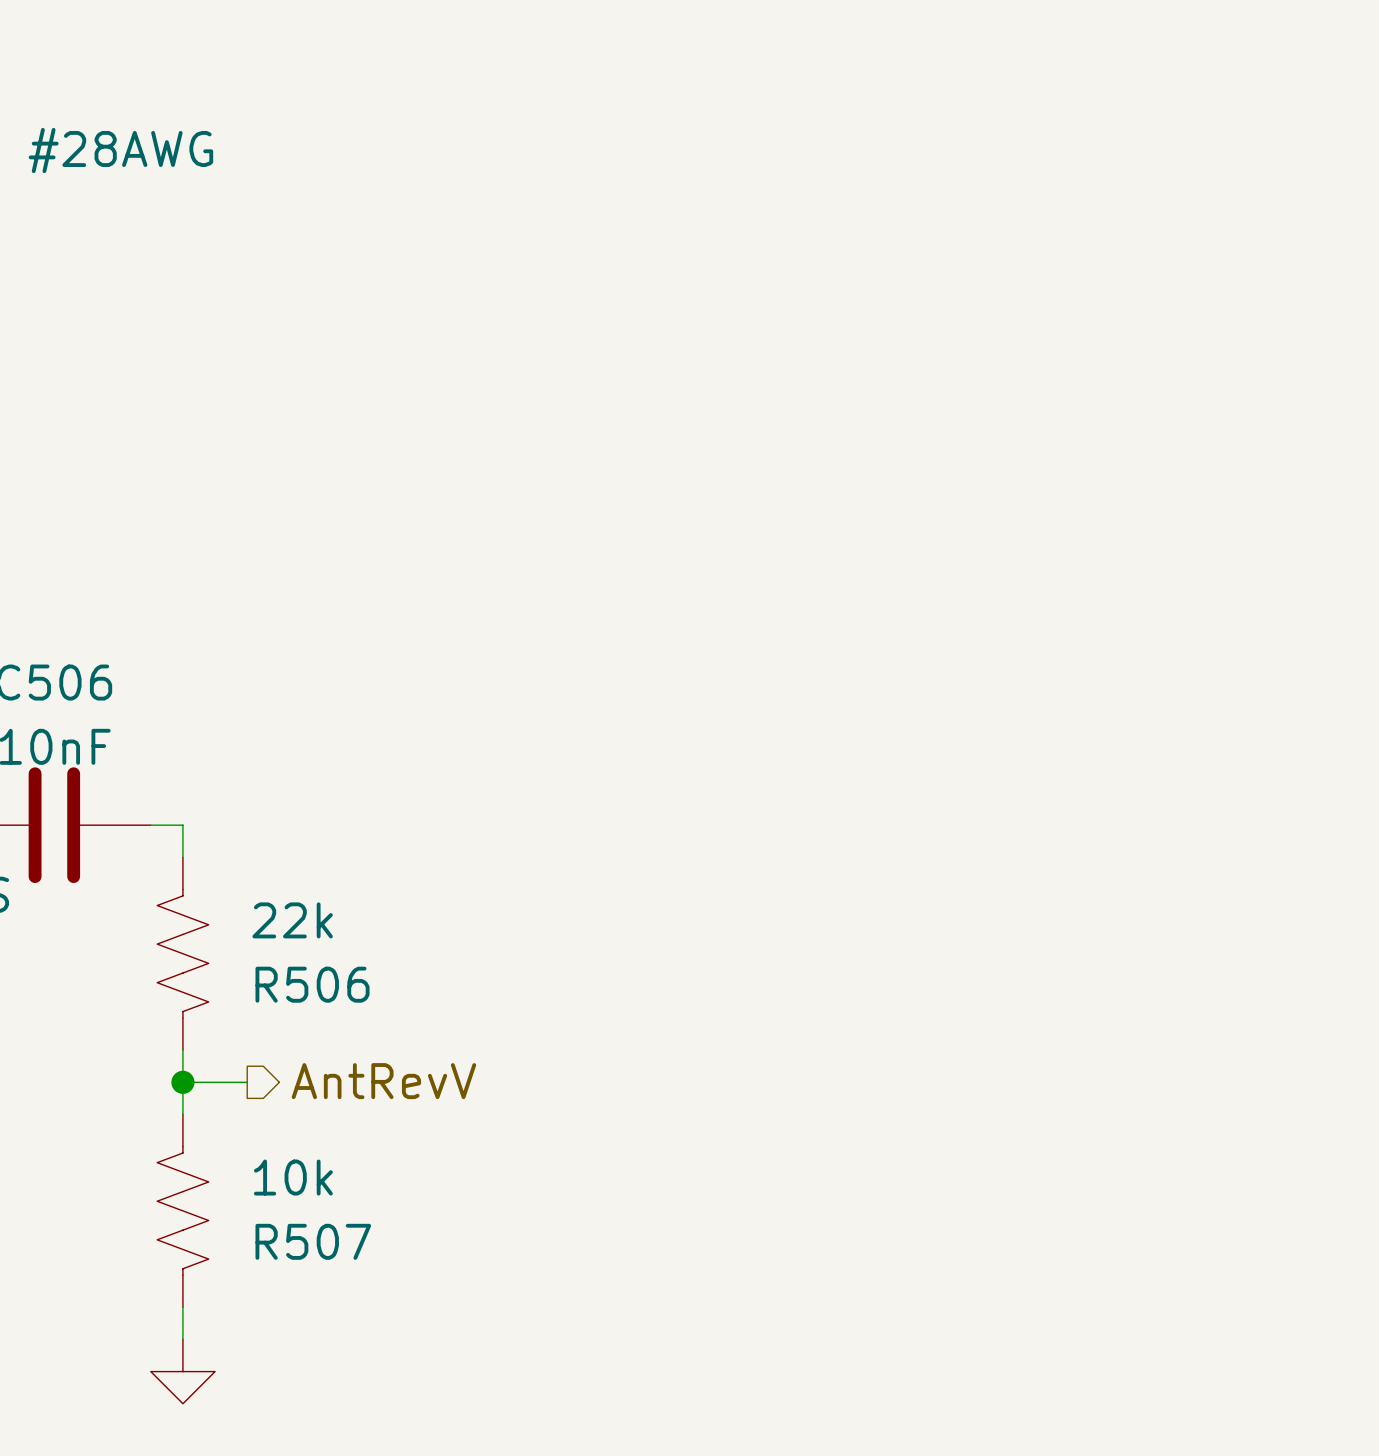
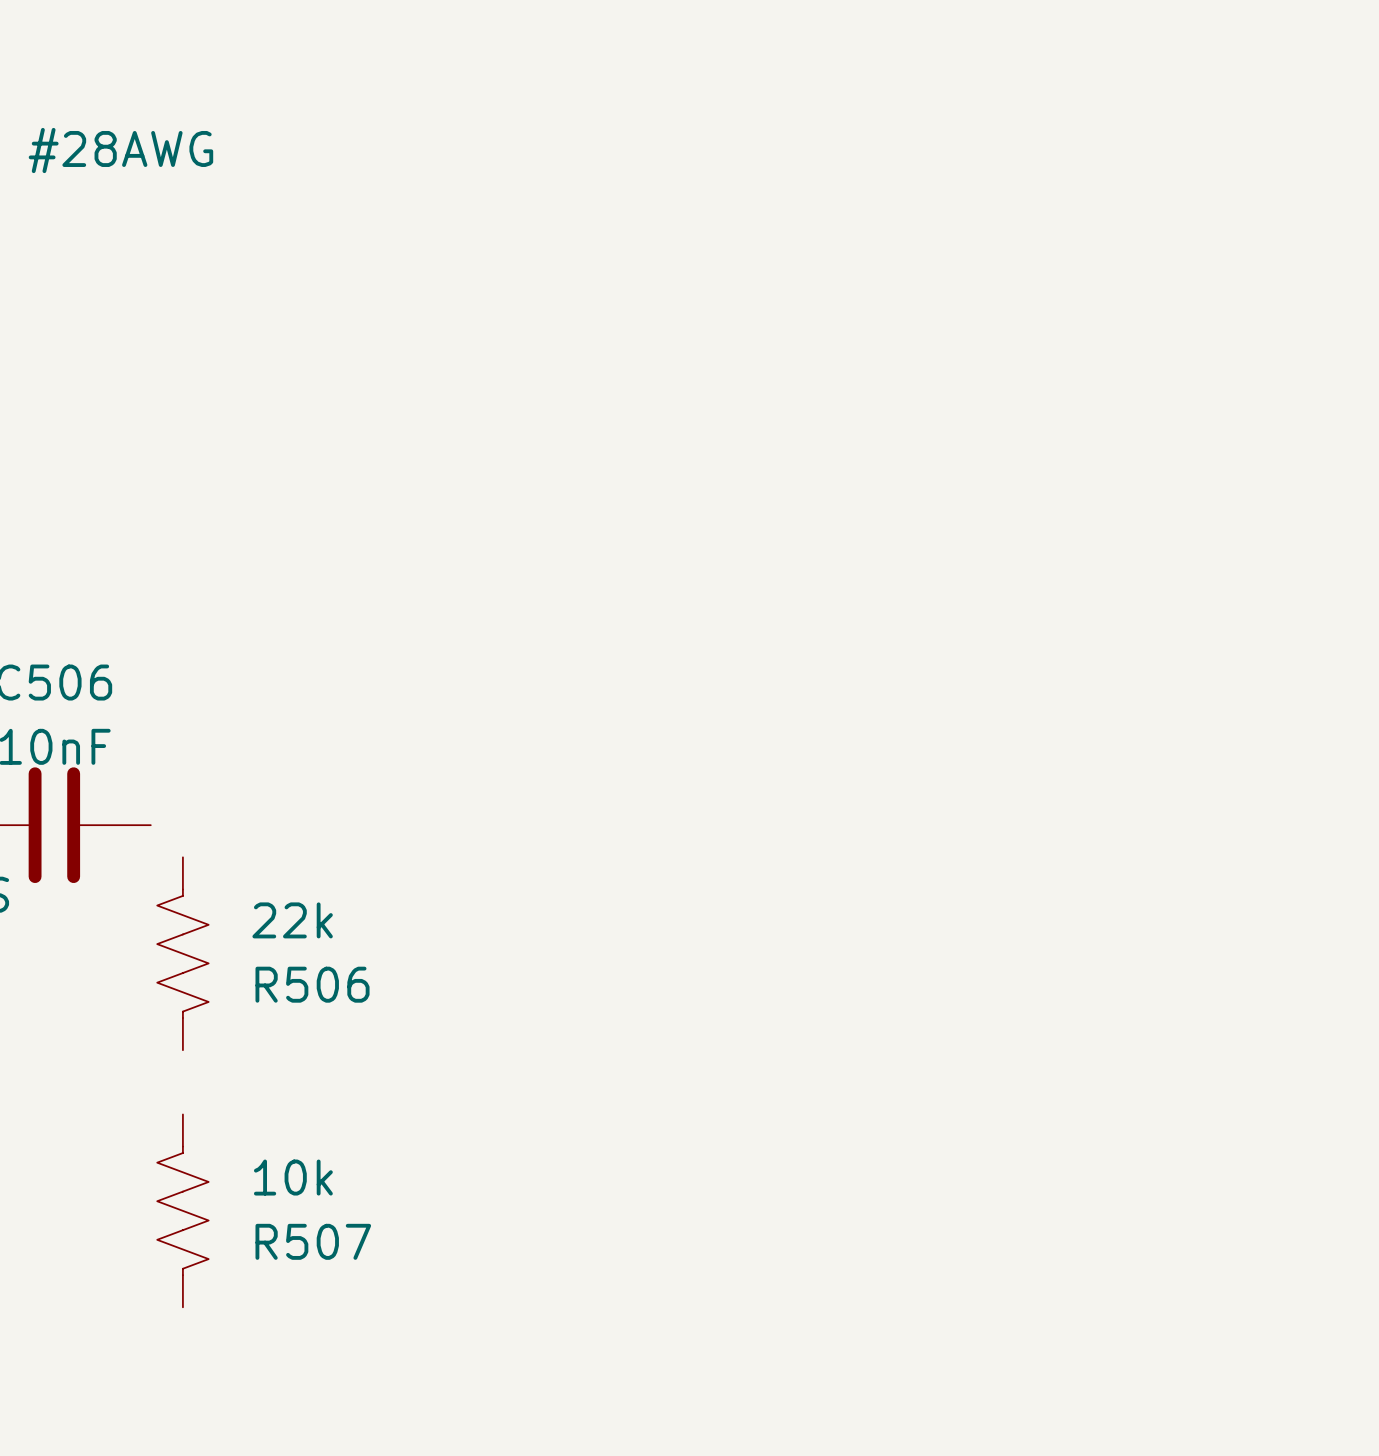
wire: (150, 825) (182, 825) (182, 857) -> none
wire: (182, 1050) (182, 1114) -> none
hierarchical label: AntRevV (383, 1081) -> none
wire: (182, 1082) (247, 1082) -> none
junction: (182, 1082) -> none
wire: (182, 1307) (182, 1339) -> none
power symbol: (182, 1371) -> none

